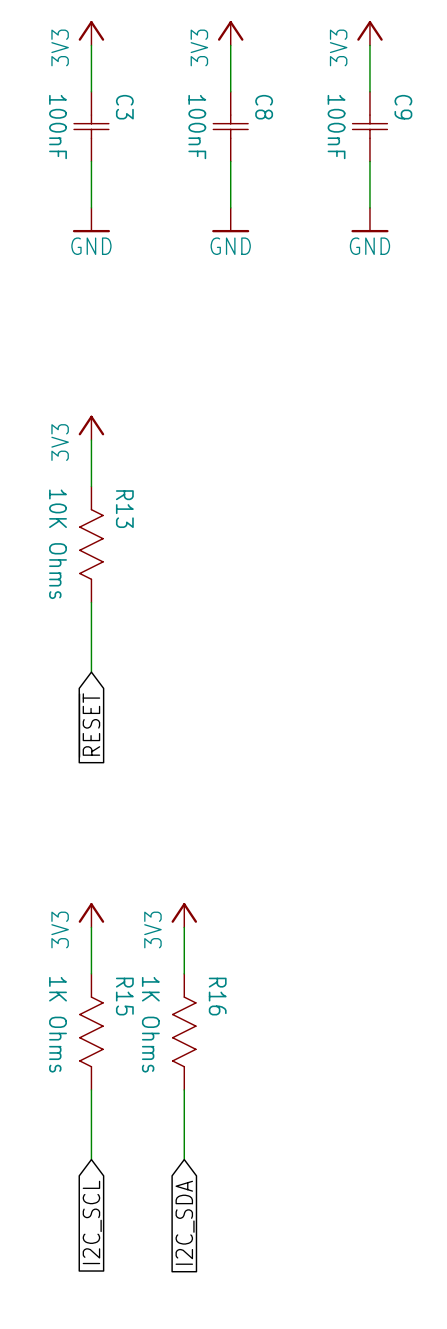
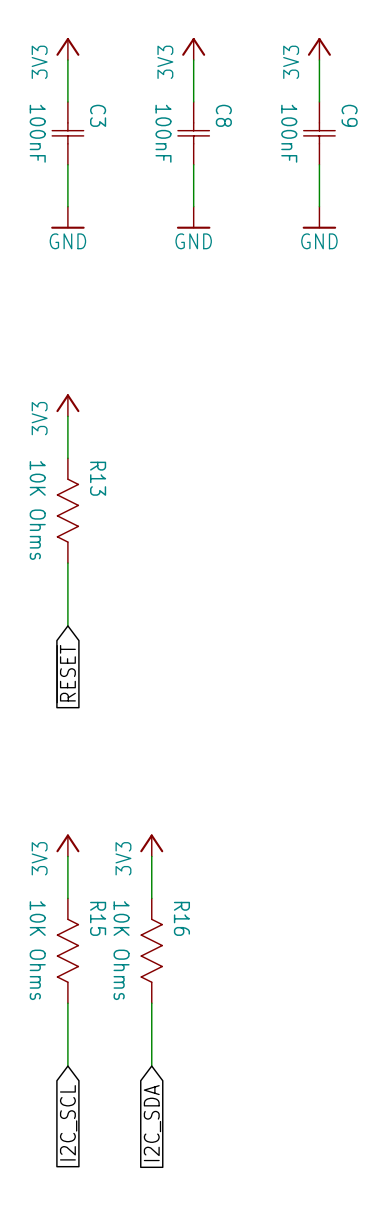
R15 value: 1K Ohms (58, 1024) -> 10K Ohms (37, 950)
R16 value: 1K Ohms (150, 1024) -> 10K Ohms (121, 950)

